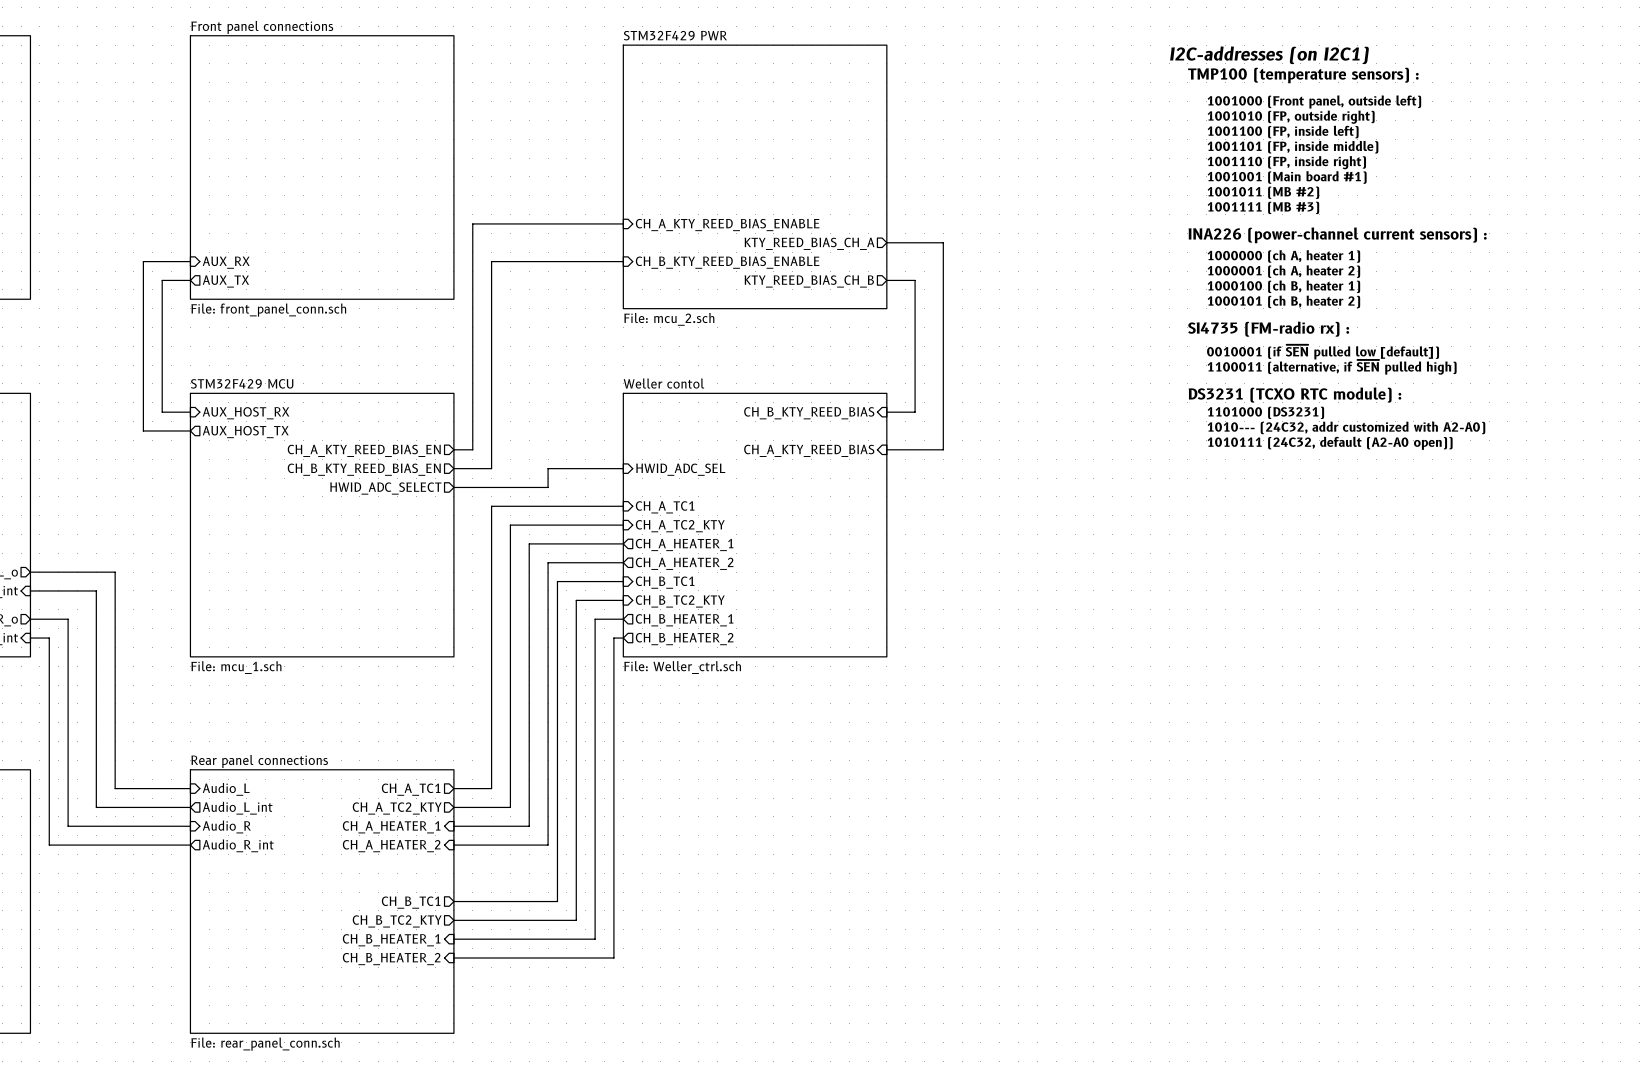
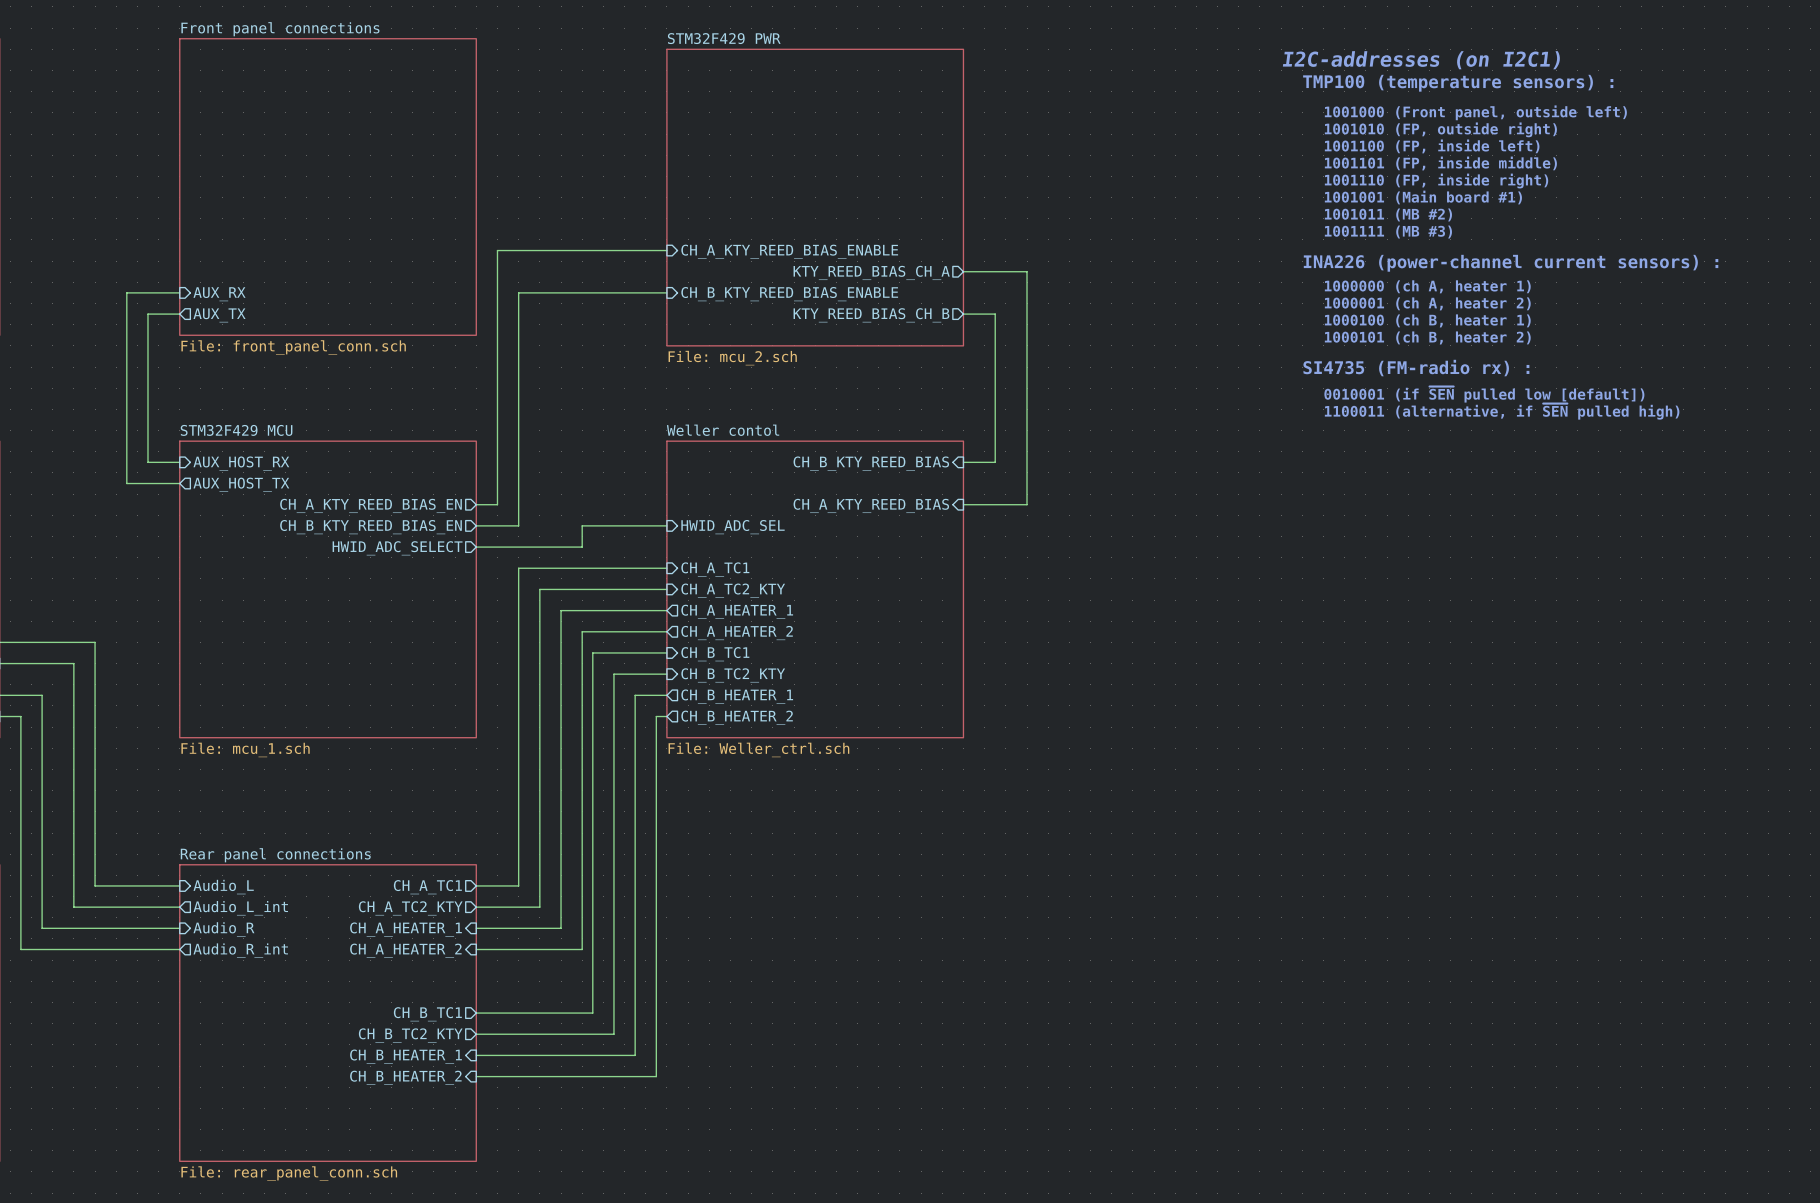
text: DS3231 (TCXO RTC module) : (1294, 395) -> none
text: 1101000 (DS3231) (1265, 412) -> none
text: 1010--- (24C32, addr customized with A2-A0) (1346, 427) -> none
text: 1010111 (24C32, default (A2-A0 open)) (1330, 443) -> none

